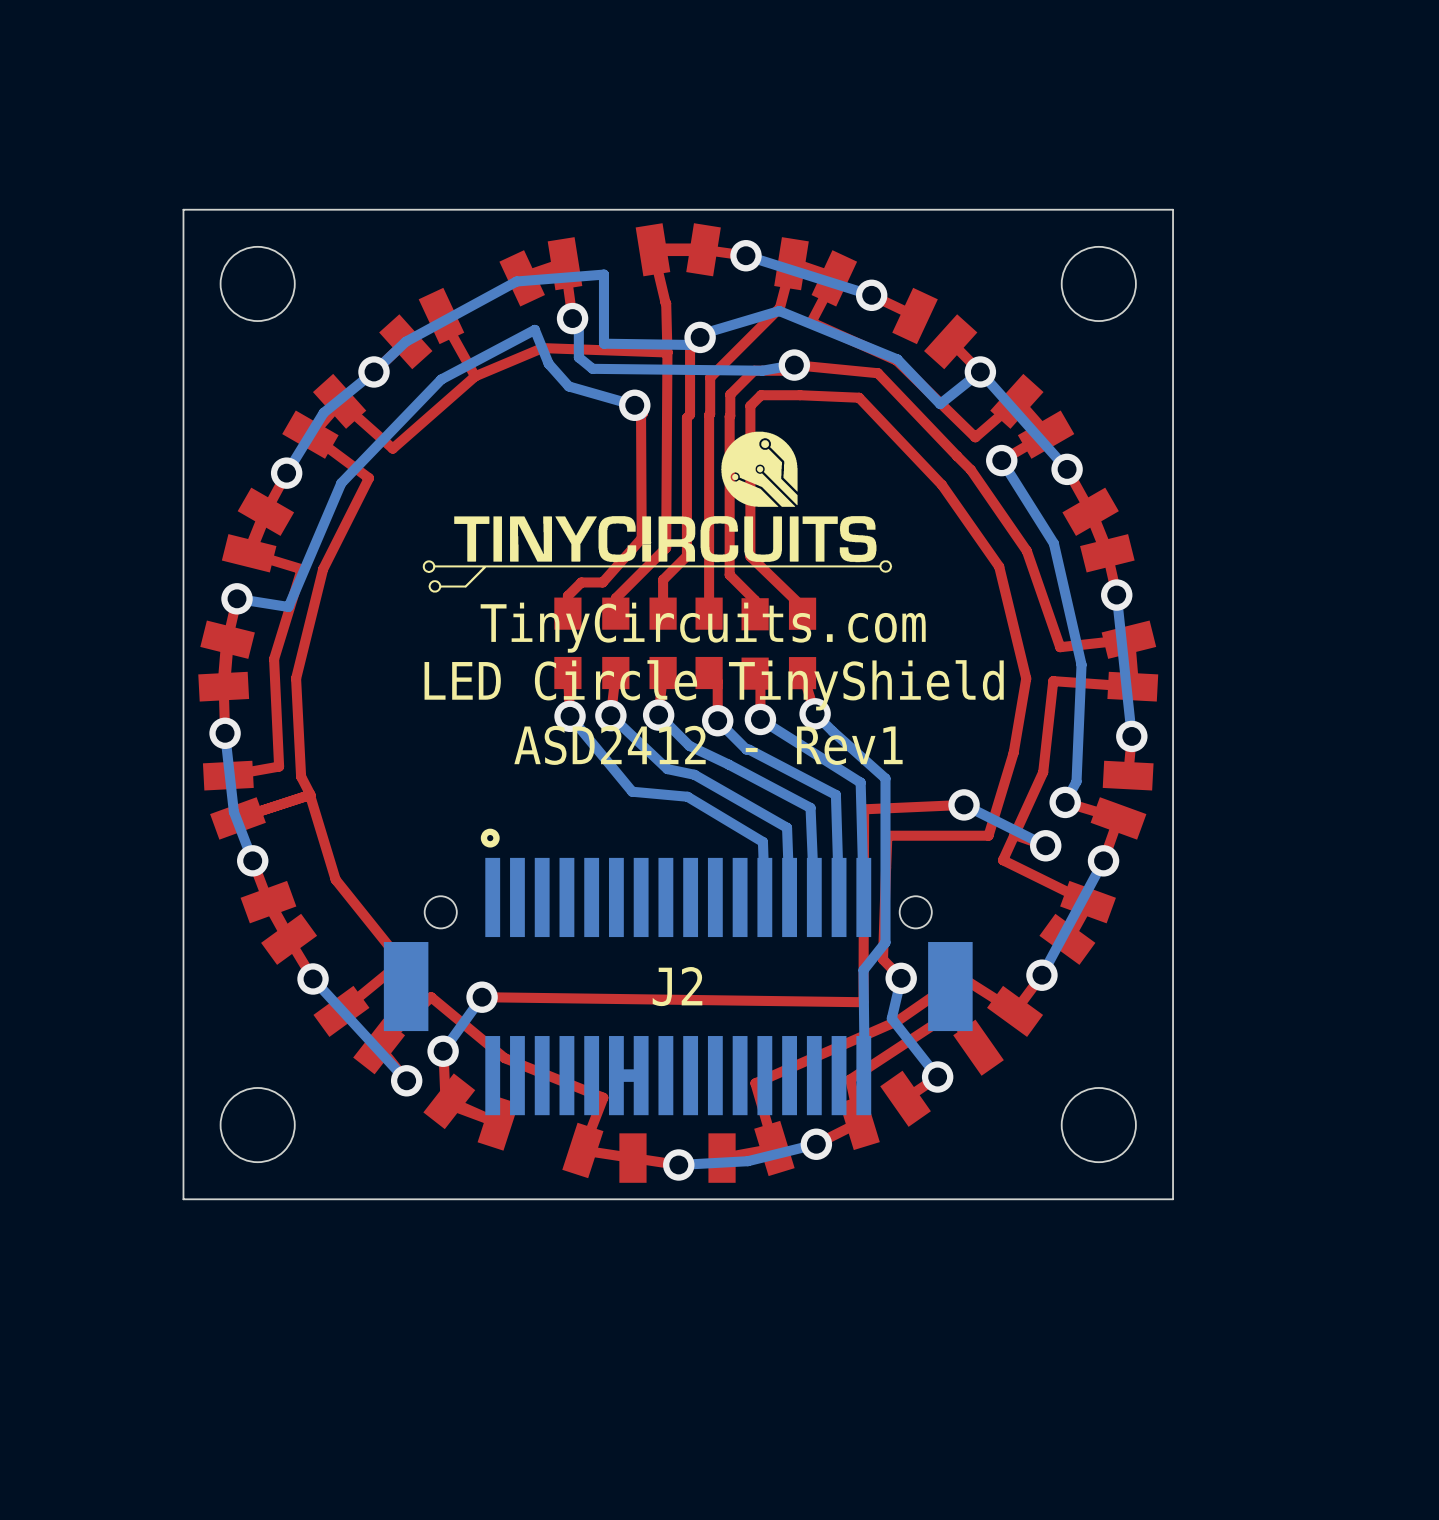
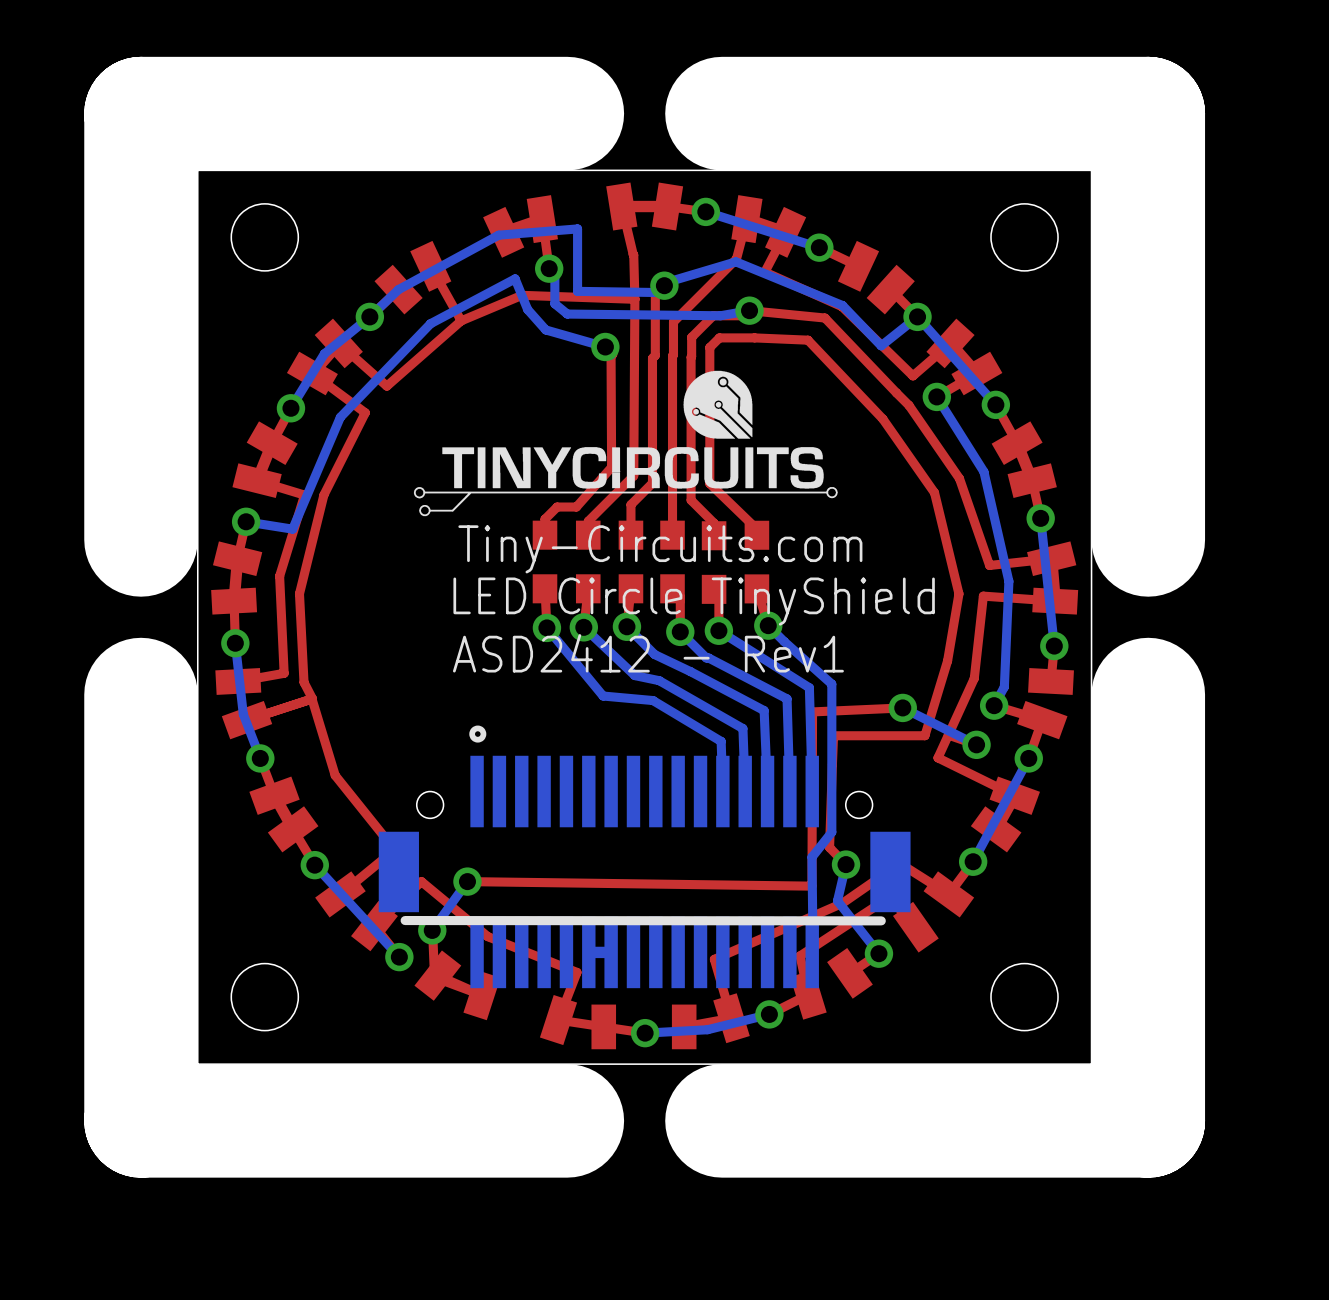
board edge: none -> (567, 113) (141, 113) (141, 539)
board edge: none -> (721, 113) (1148, 113) (1148, 539)
text: TinyCircuits.com (703, 627) -> Tiny-Circuits.com (660, 549)
board edge: none -> (141, 694) (141, 1120) (567, 1120)
board edge: none -> (1148, 694) (1148, 1120) (721, 1120)
part: none -> (644, 856)
J2: (678, 971) -> none

